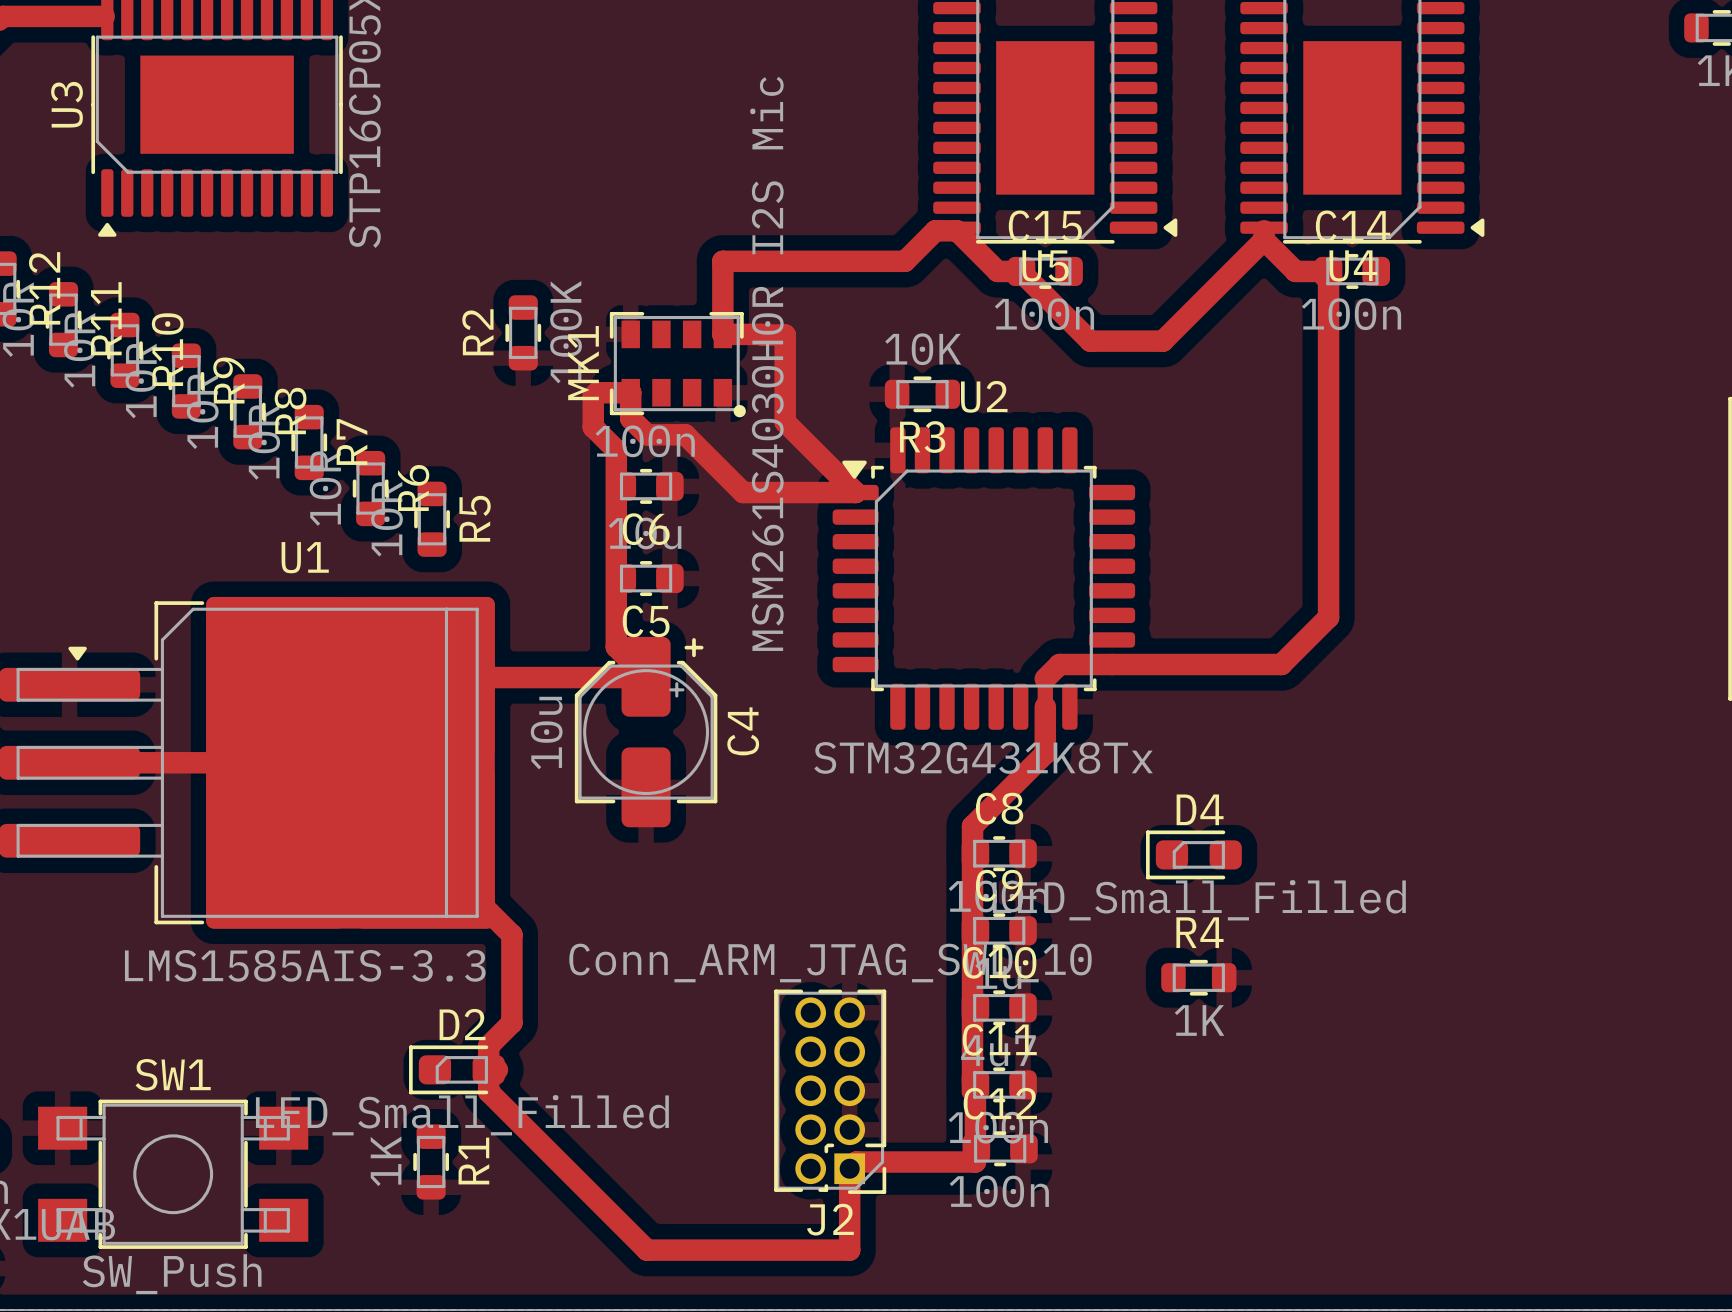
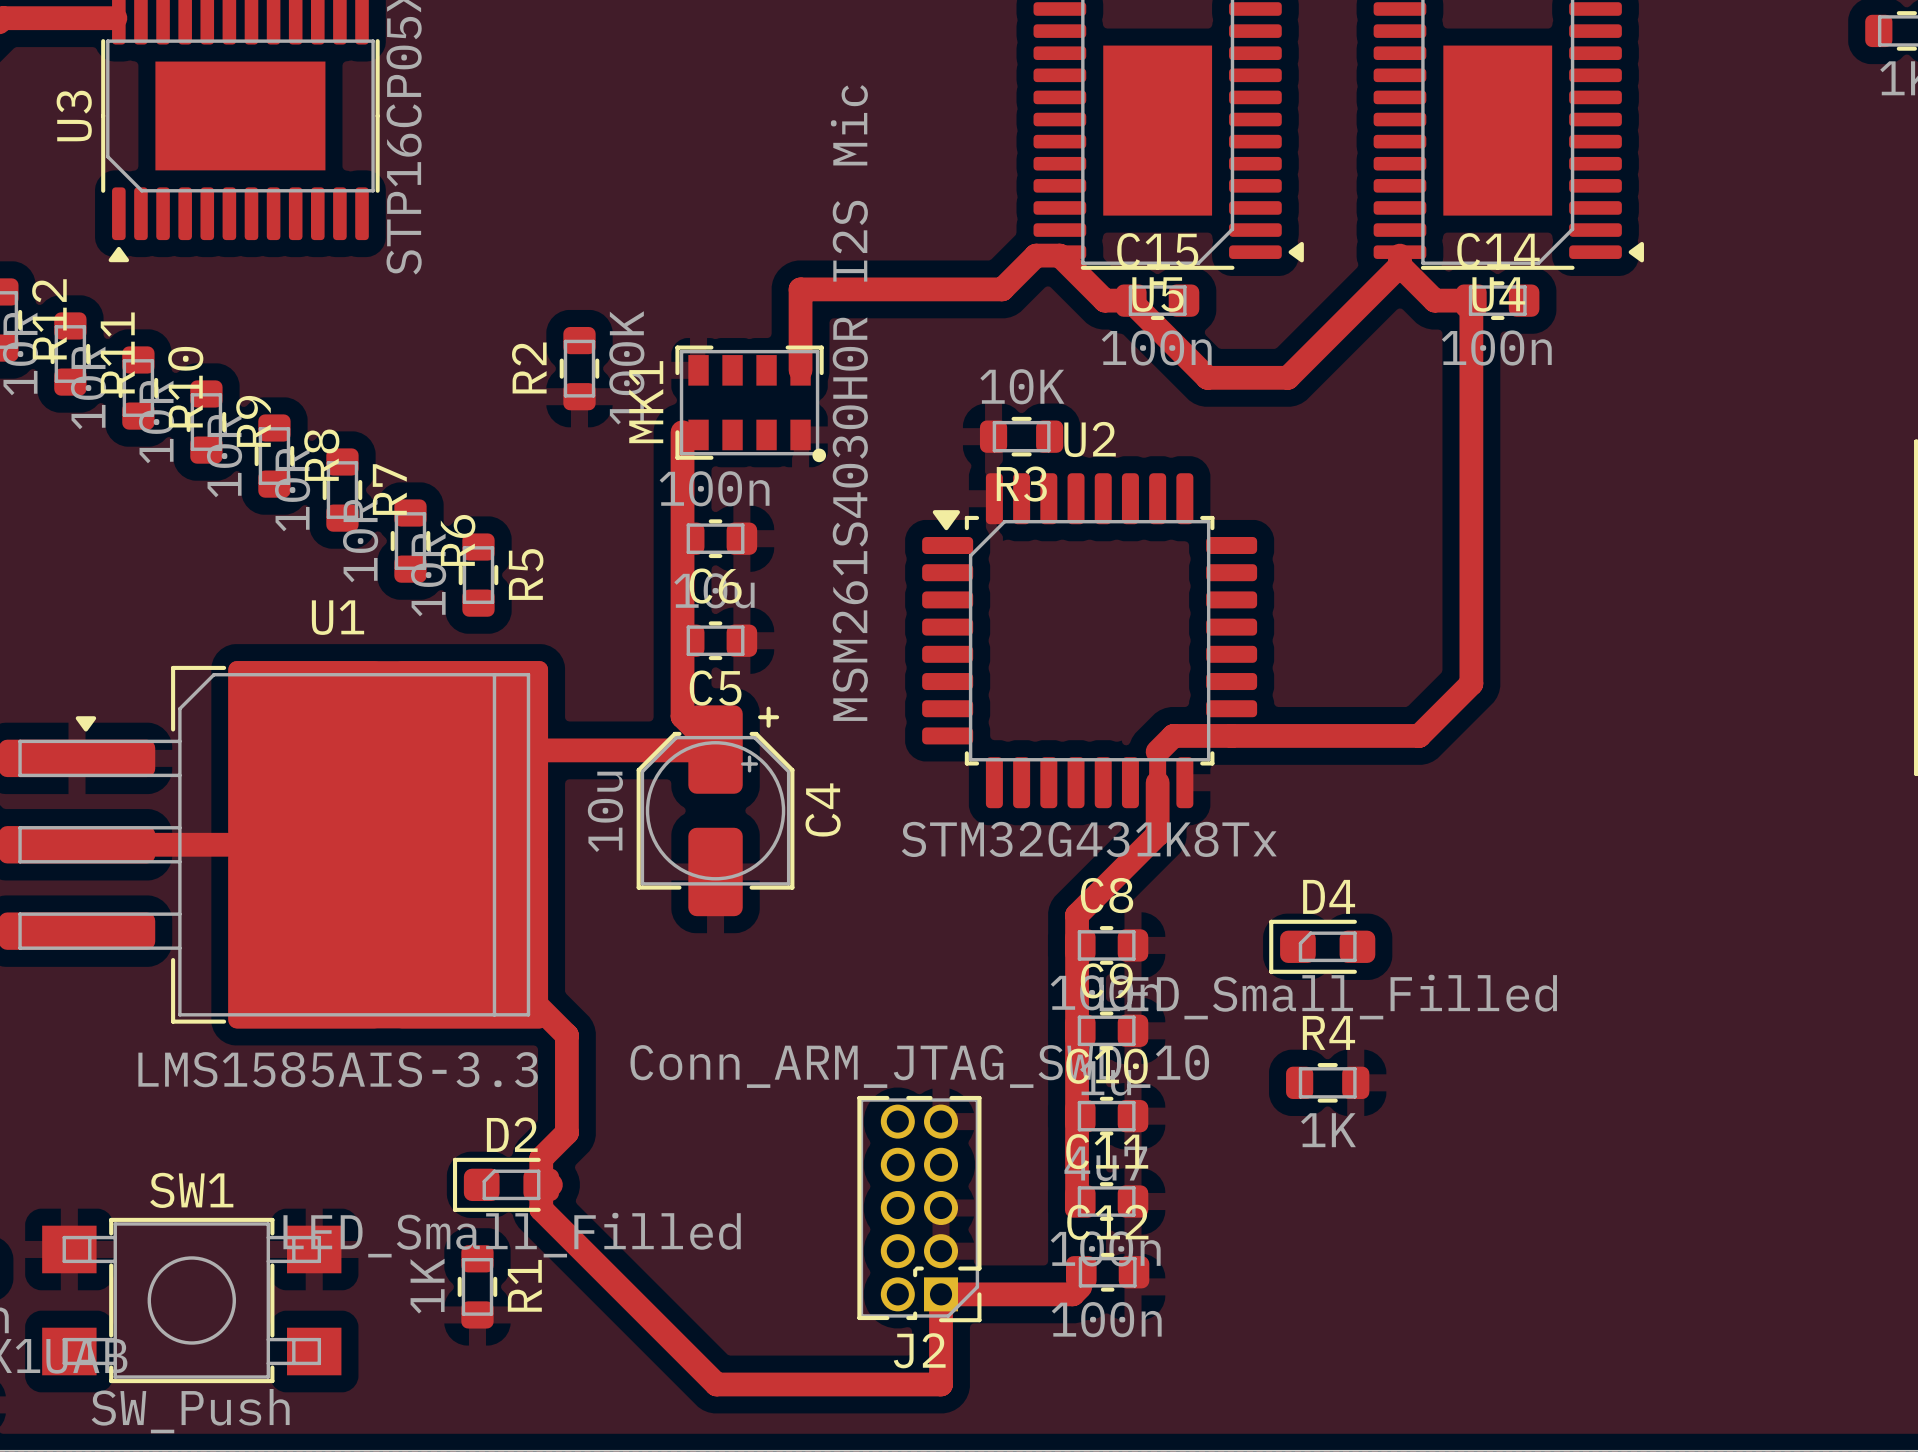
track: (722, 334) (785, 335) (785, 422) (855, 492) (743, 492) (685, 434) (647, 434) (630, 418) (630, 392) (596, 392) (593, 396) (593, 427) (616, 450) -> (682, 432) (682, 498)
track: (972, 1081) (975, 1084) (975, 1162) (856, 1162) (849, 1168) -> (1080, 1286) (1072, 1294) (941, 1294)

